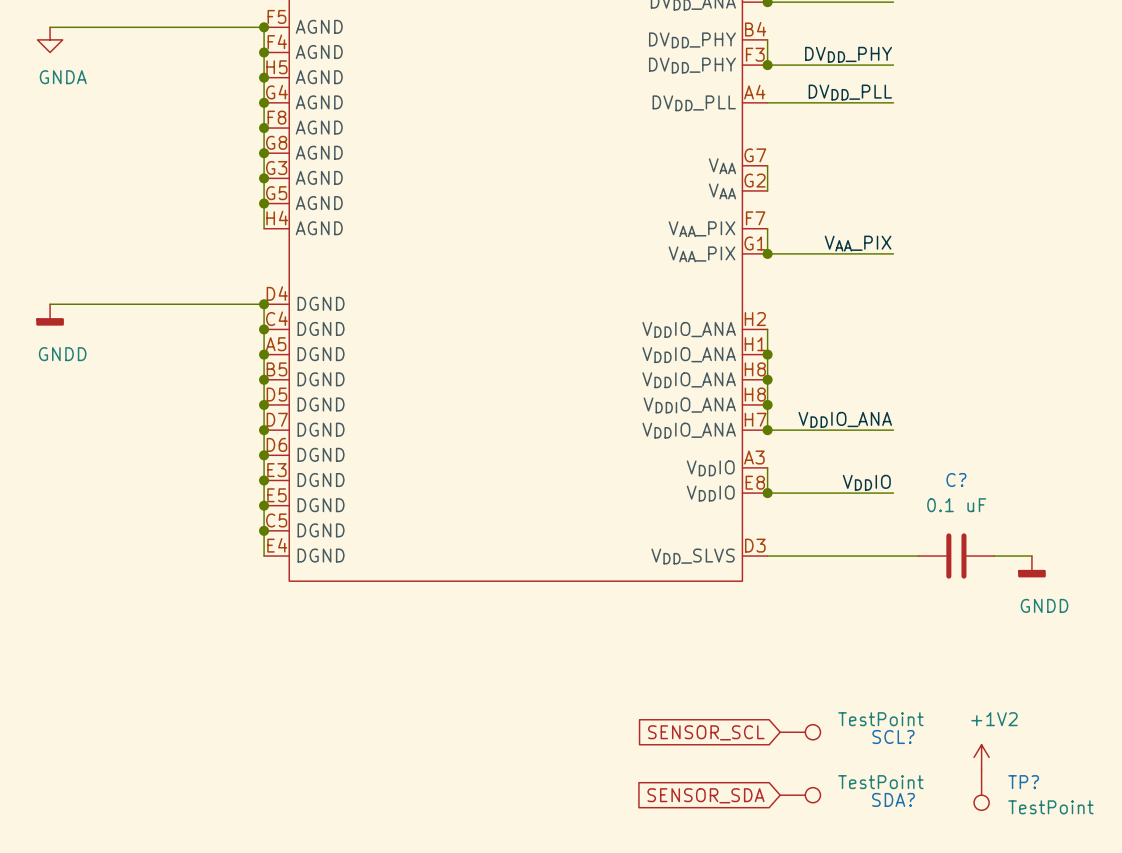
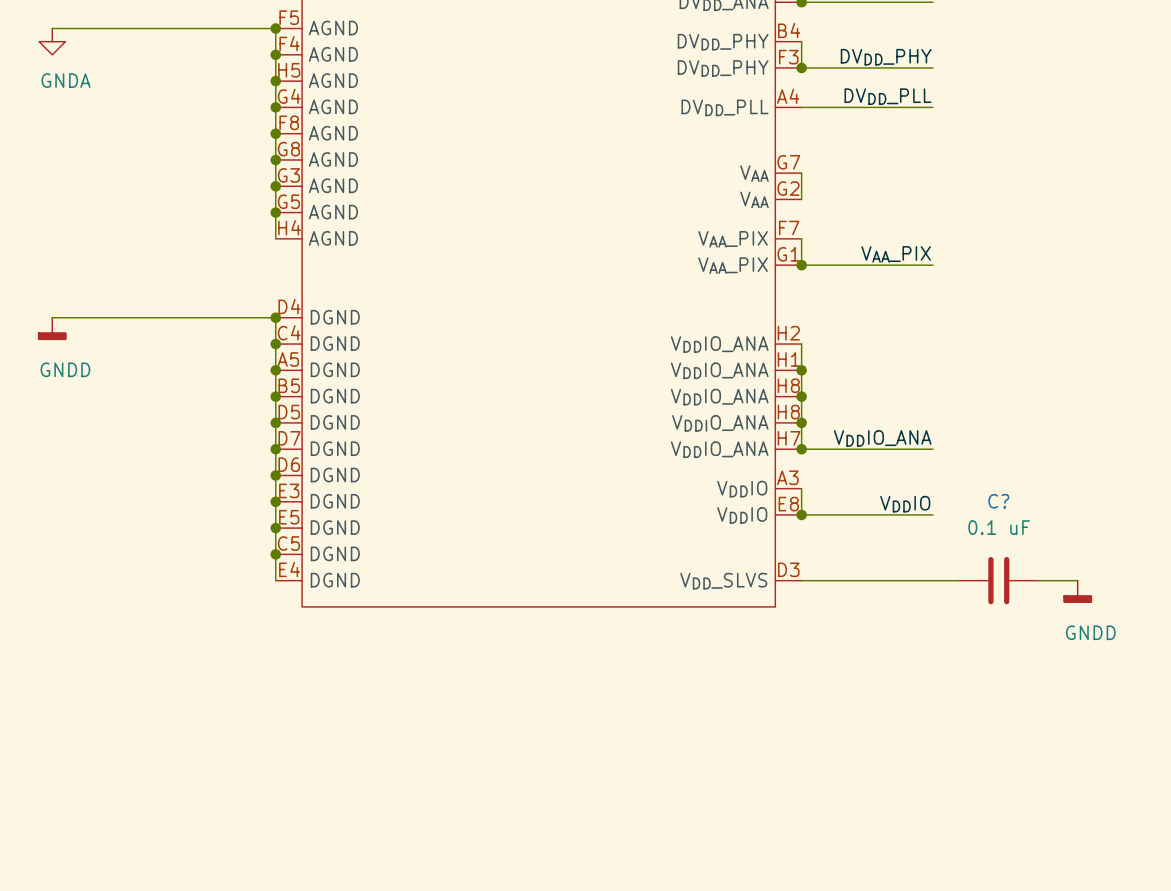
global label: SENSOR_SCL (706, 732) -> none
SCL?: TestPoint (800, 732) -> none
power symbol: +1V2 (981, 757) -> none
TP?: TestPoint (981, 790) -> none
global label: SENSOR_SDA (705, 795) -> none
SDA?: TestPoint (800, 795) -> none

